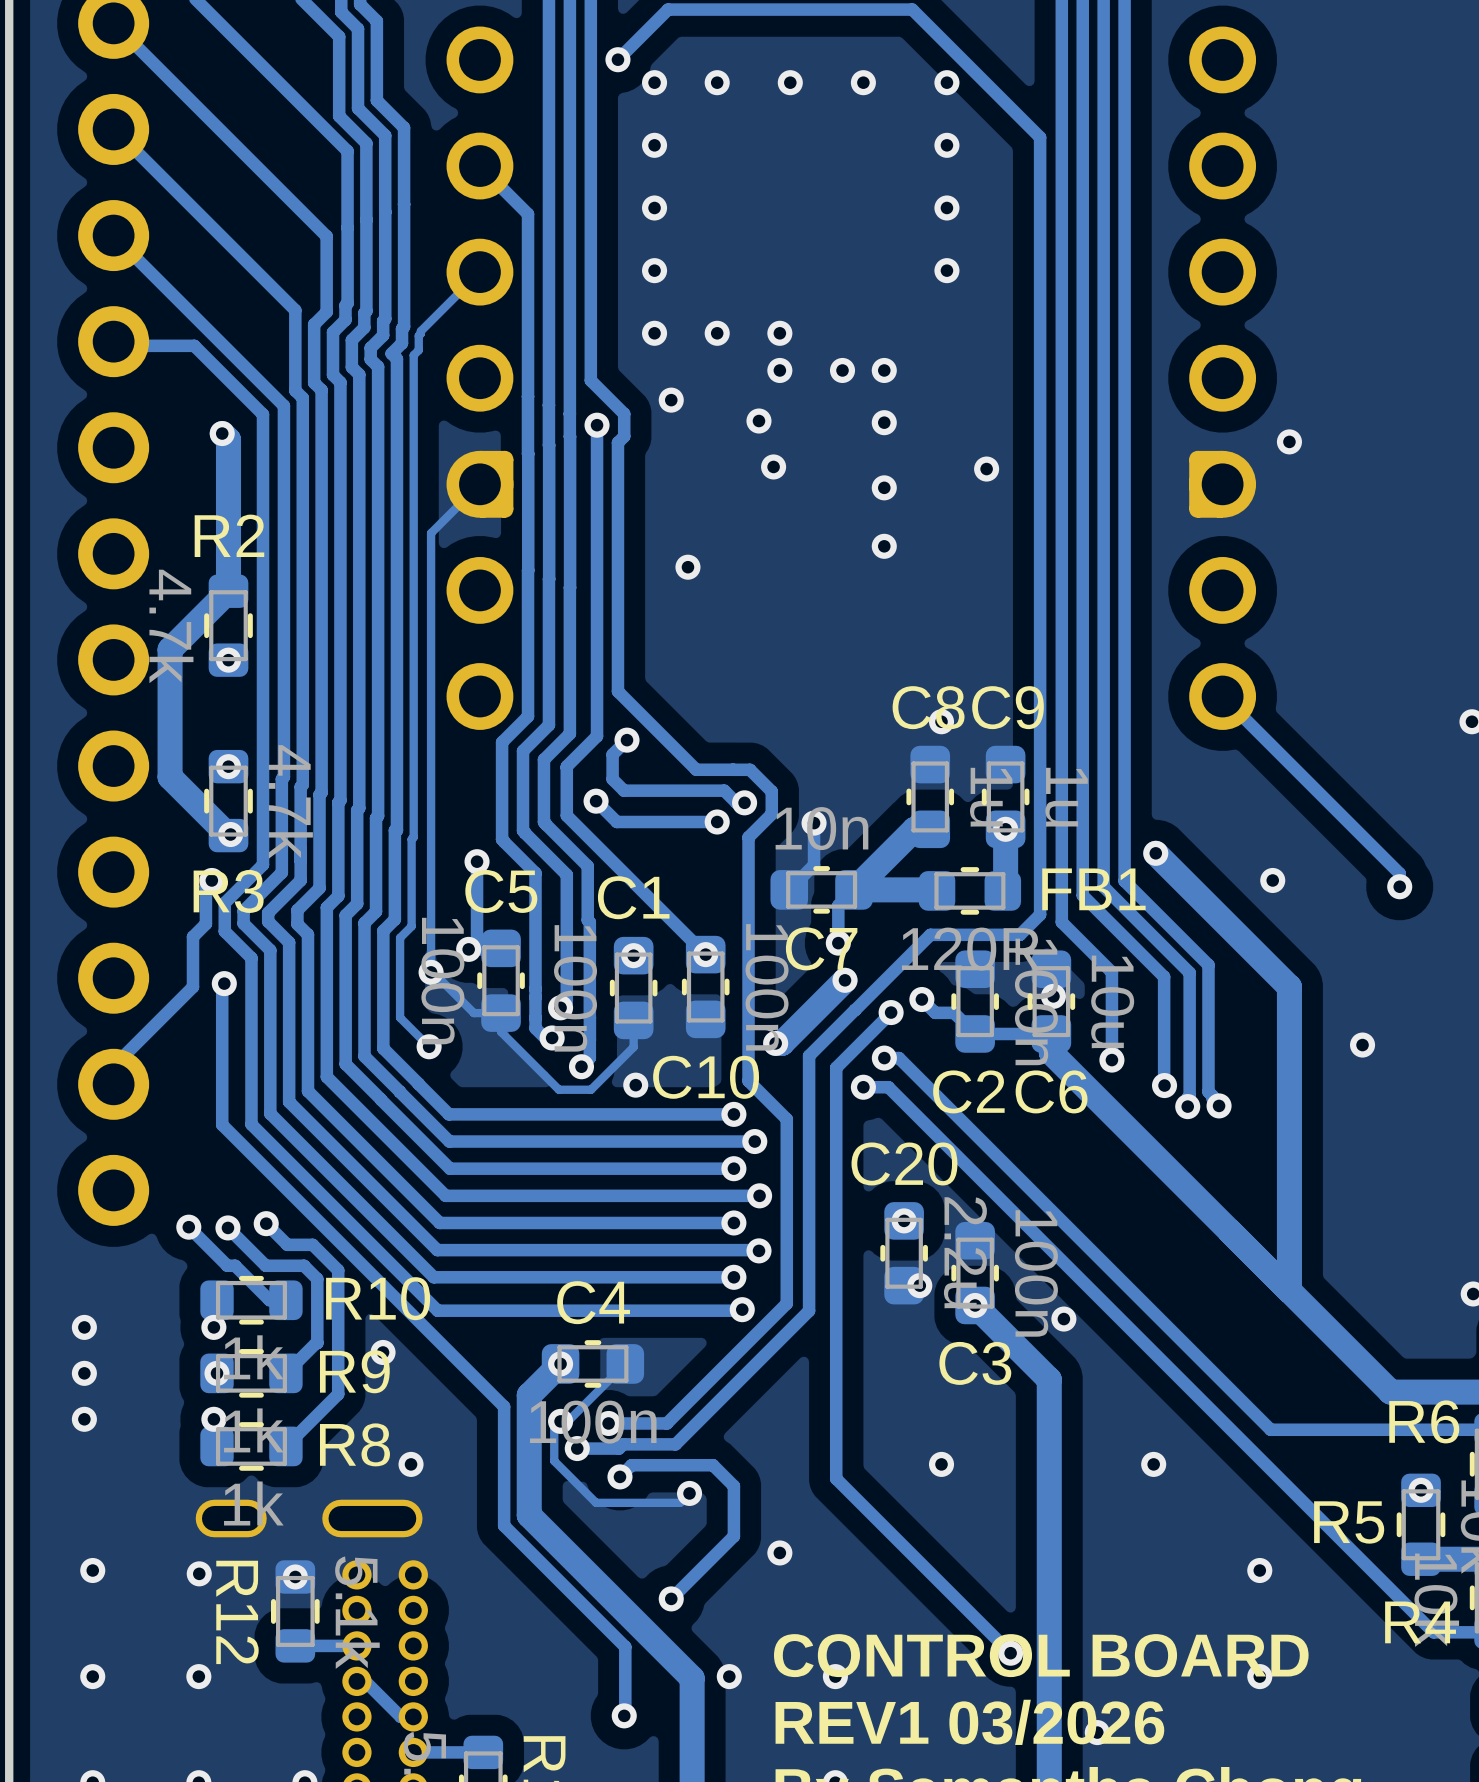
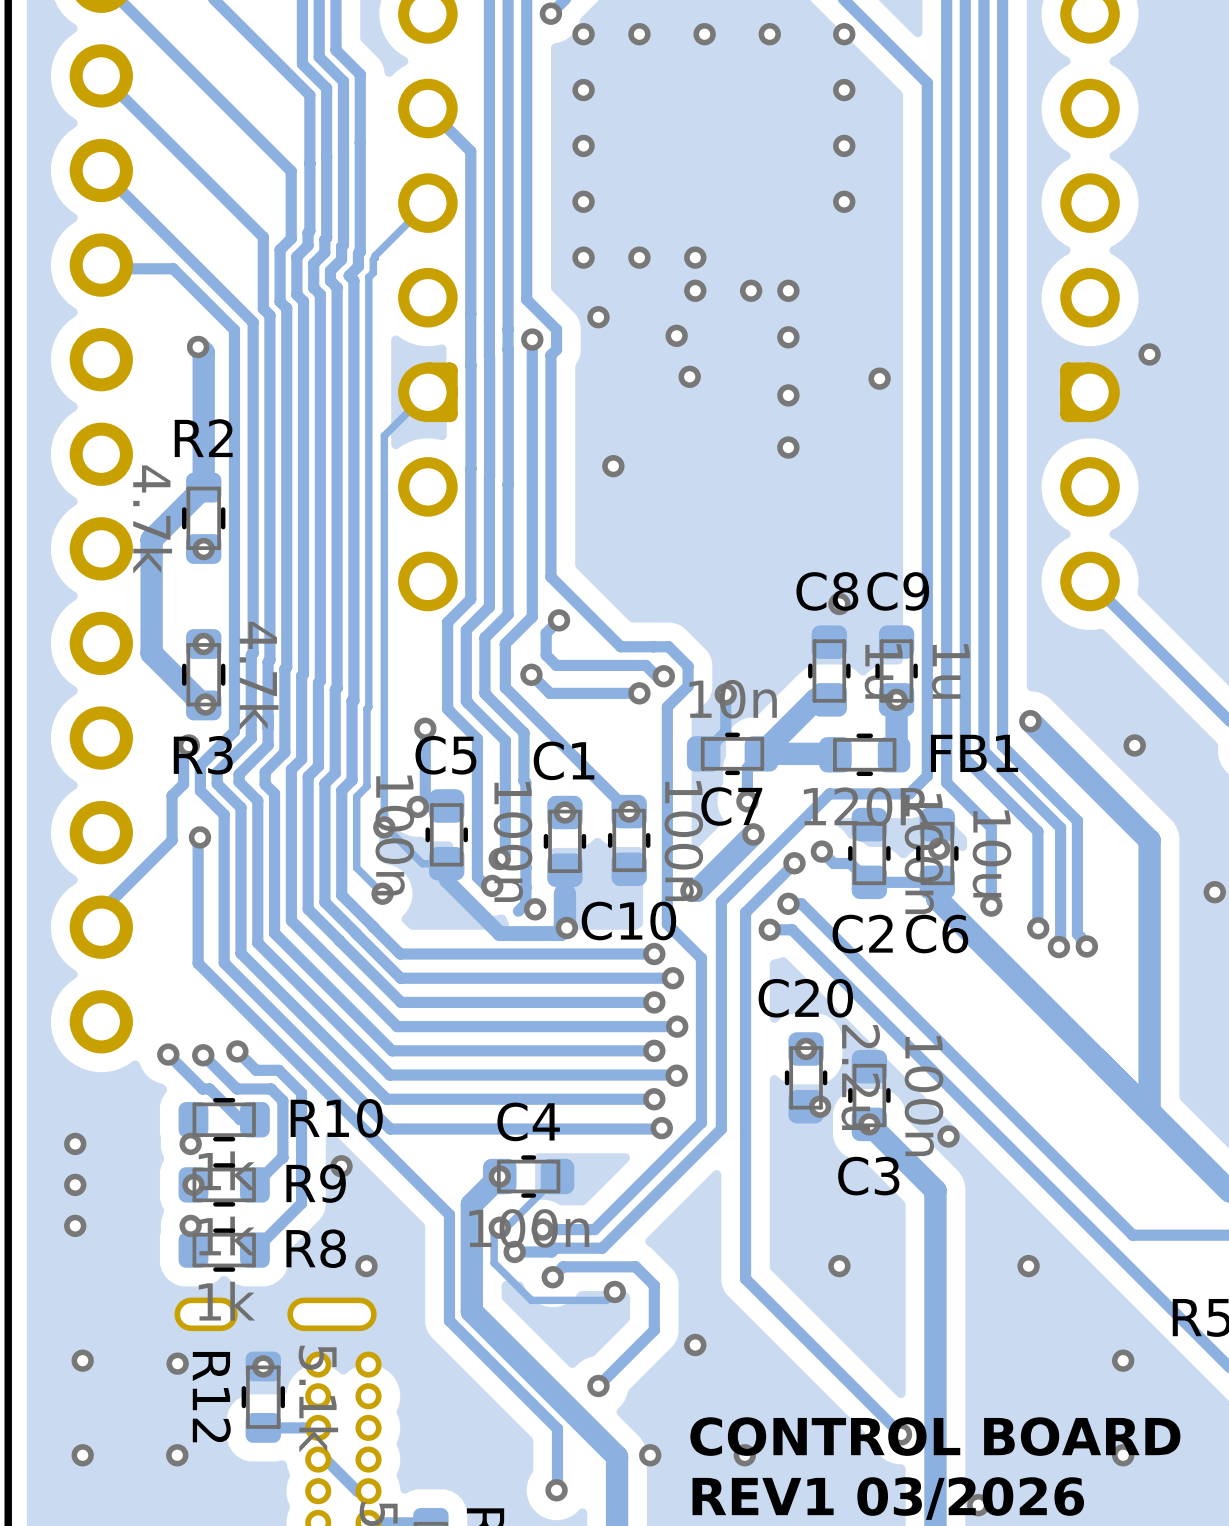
track width: thin (501, 1013) (501, 1031) (558, 1089) -> thick (446, 863) (446, 880) (498, 932)
track: (633, 1047) (591, 1089) (558, 1089) -> (564, 894) (564, 926) (566, 927) (561, 933) (498, 932)
via position: (581, 1066) -> (535, 909)

